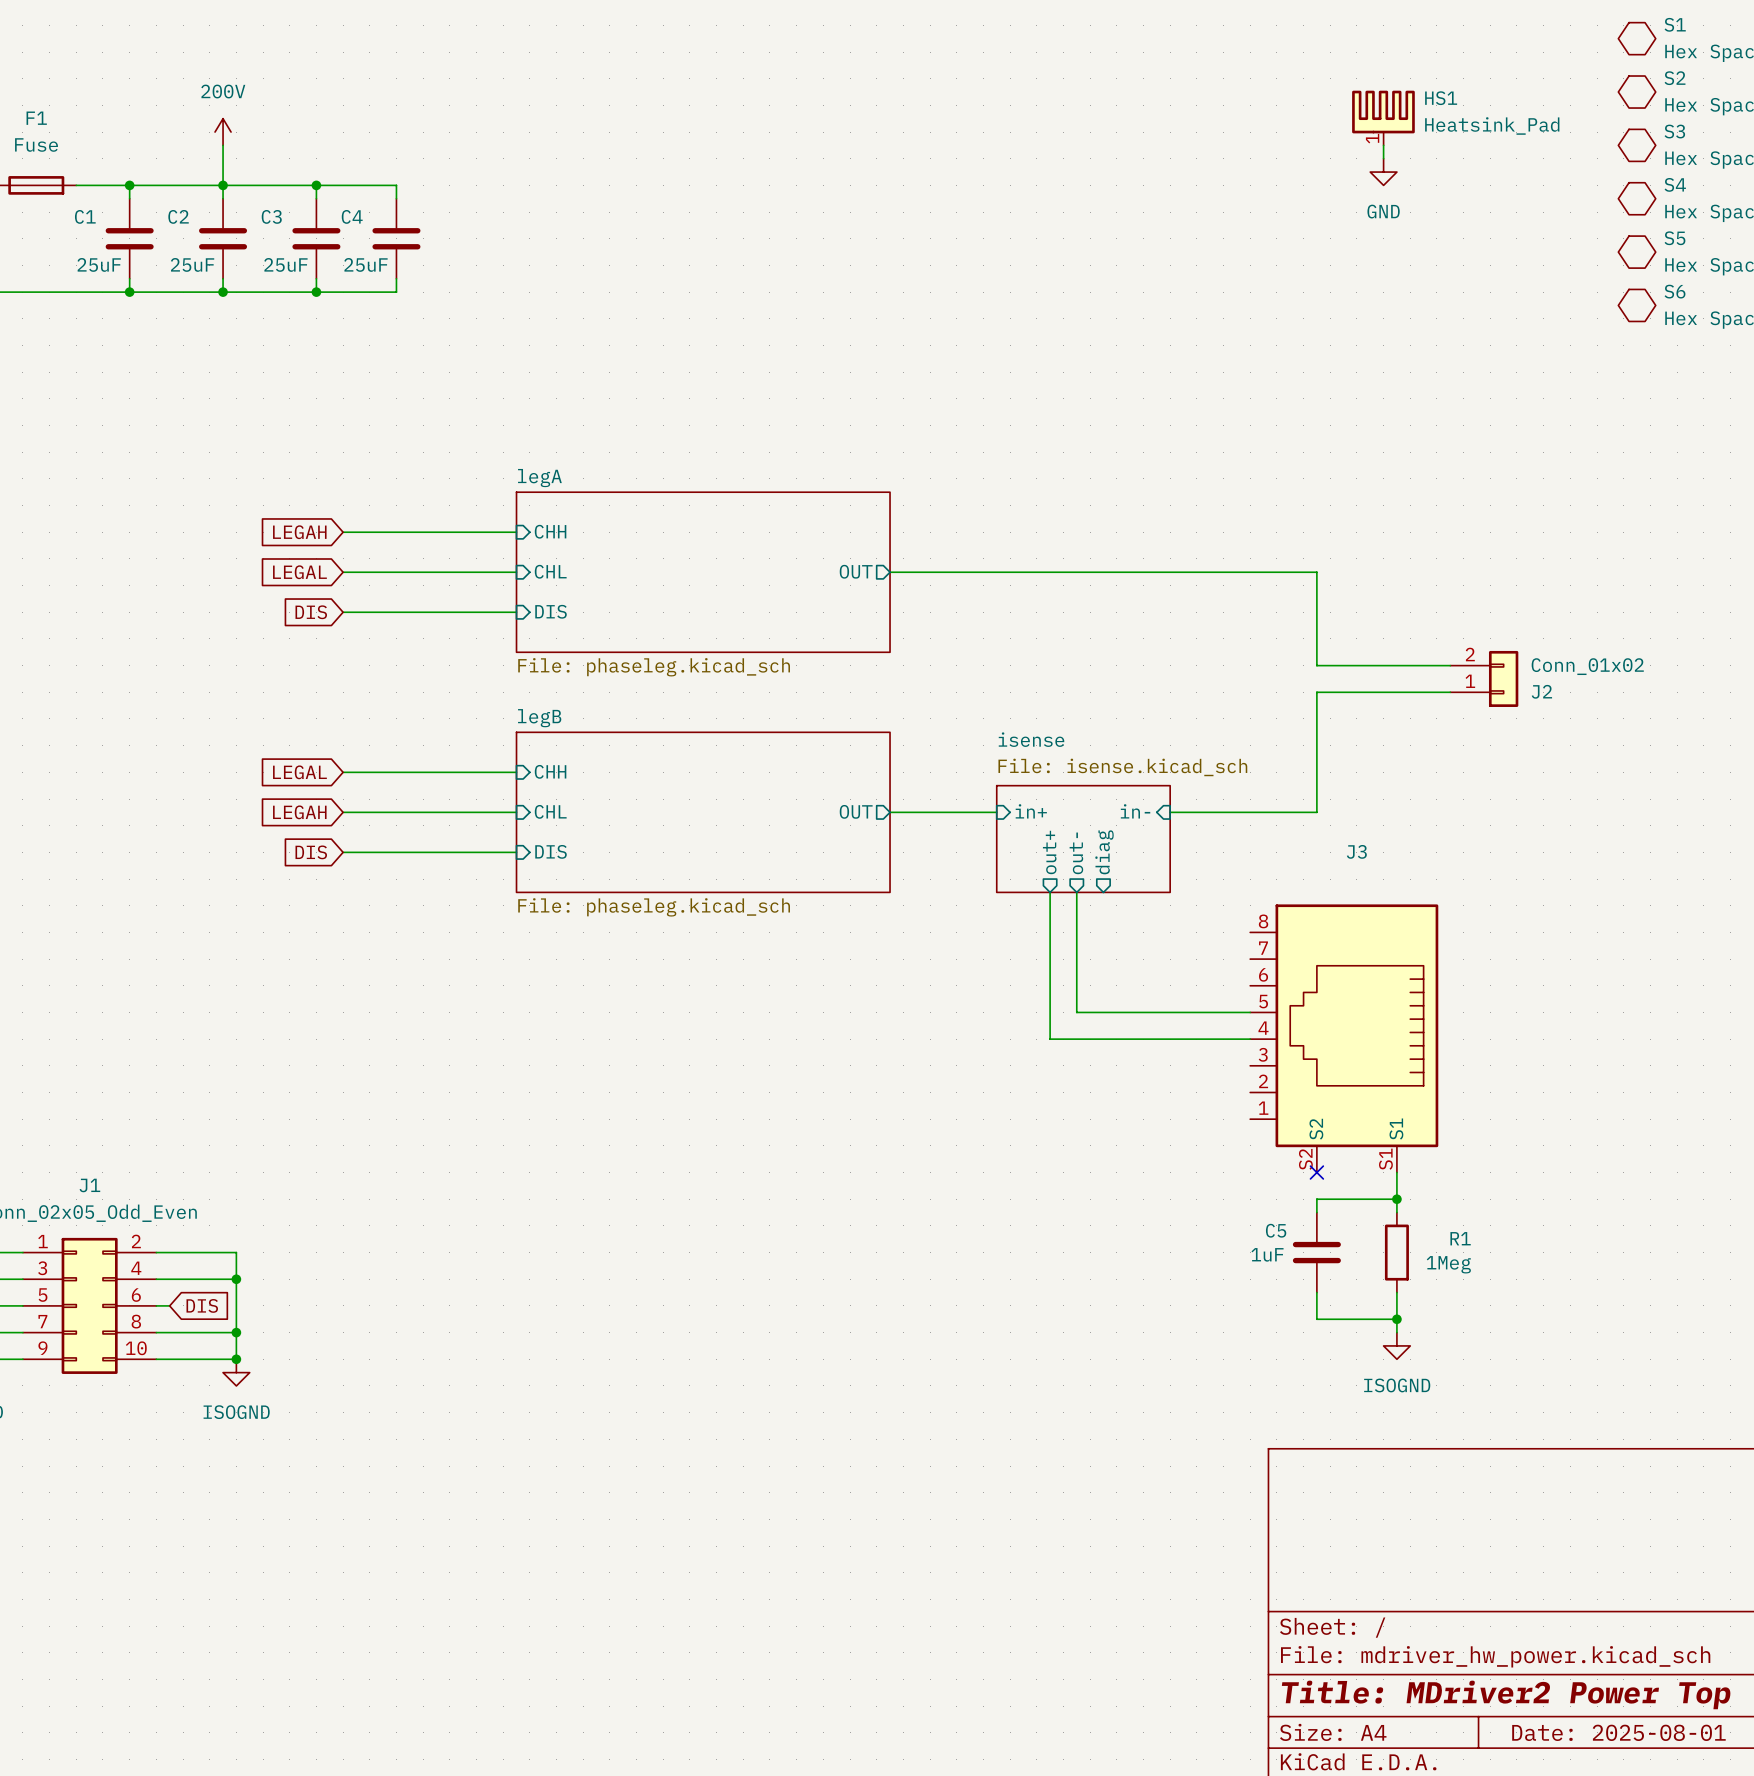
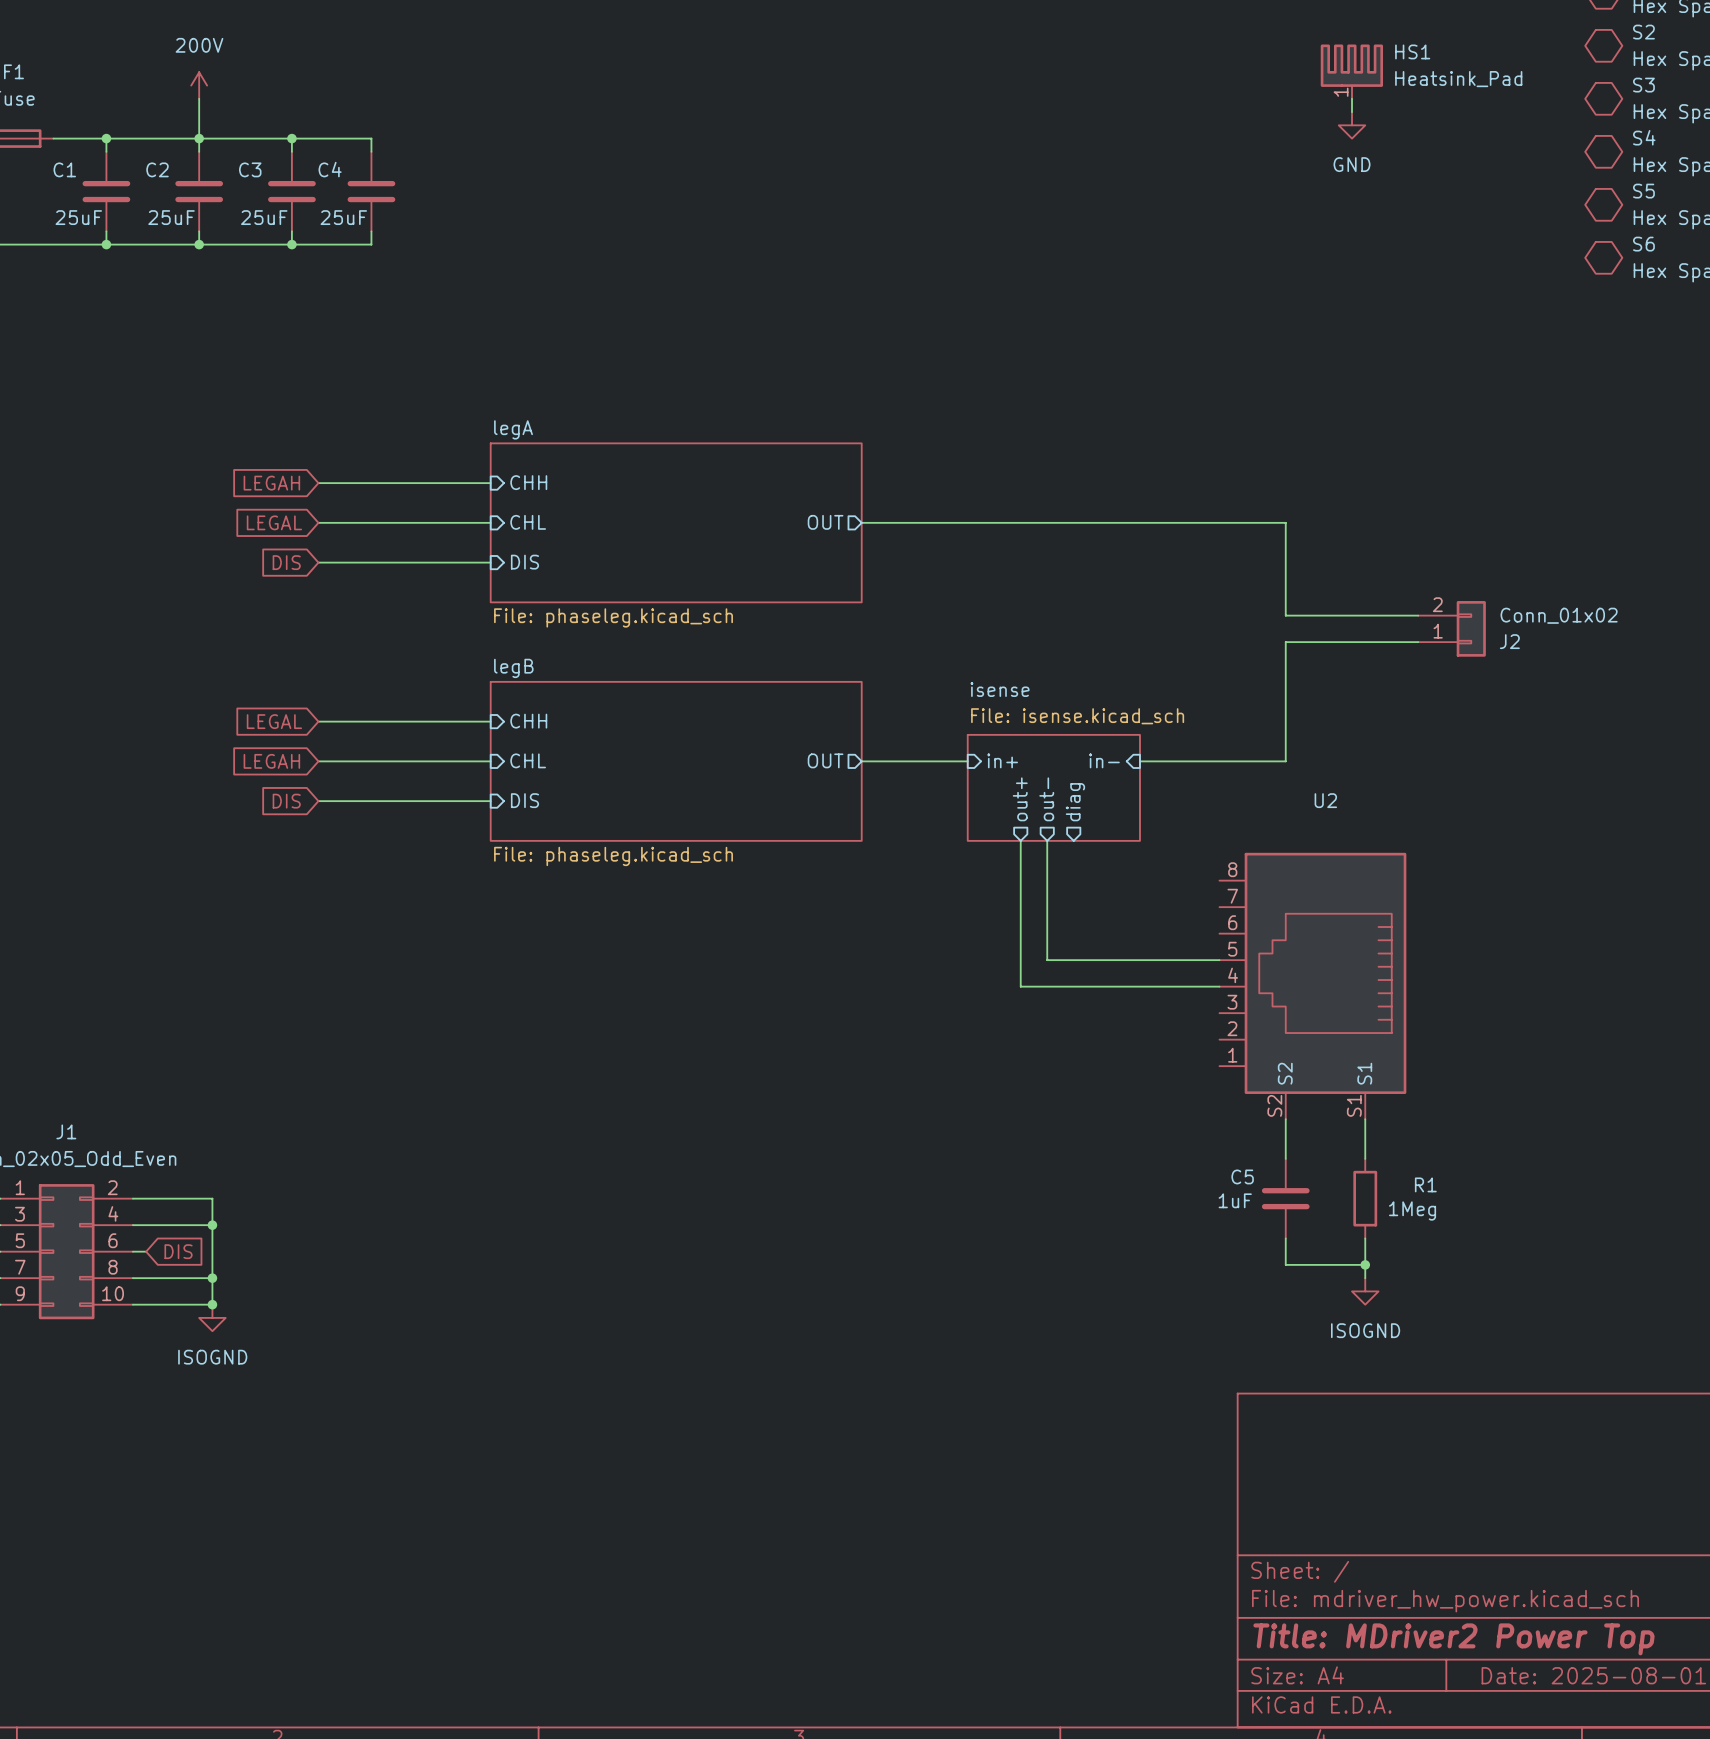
J3 name: J3 (1356, 851) -> U2 (1325, 800)
no-connect mark: (1316, 1172) -> none
wire: (1316, 1199) (1396, 1199) -> (1285, 1145) (1285, 1119)
junction: (1396, 1199) -> none

